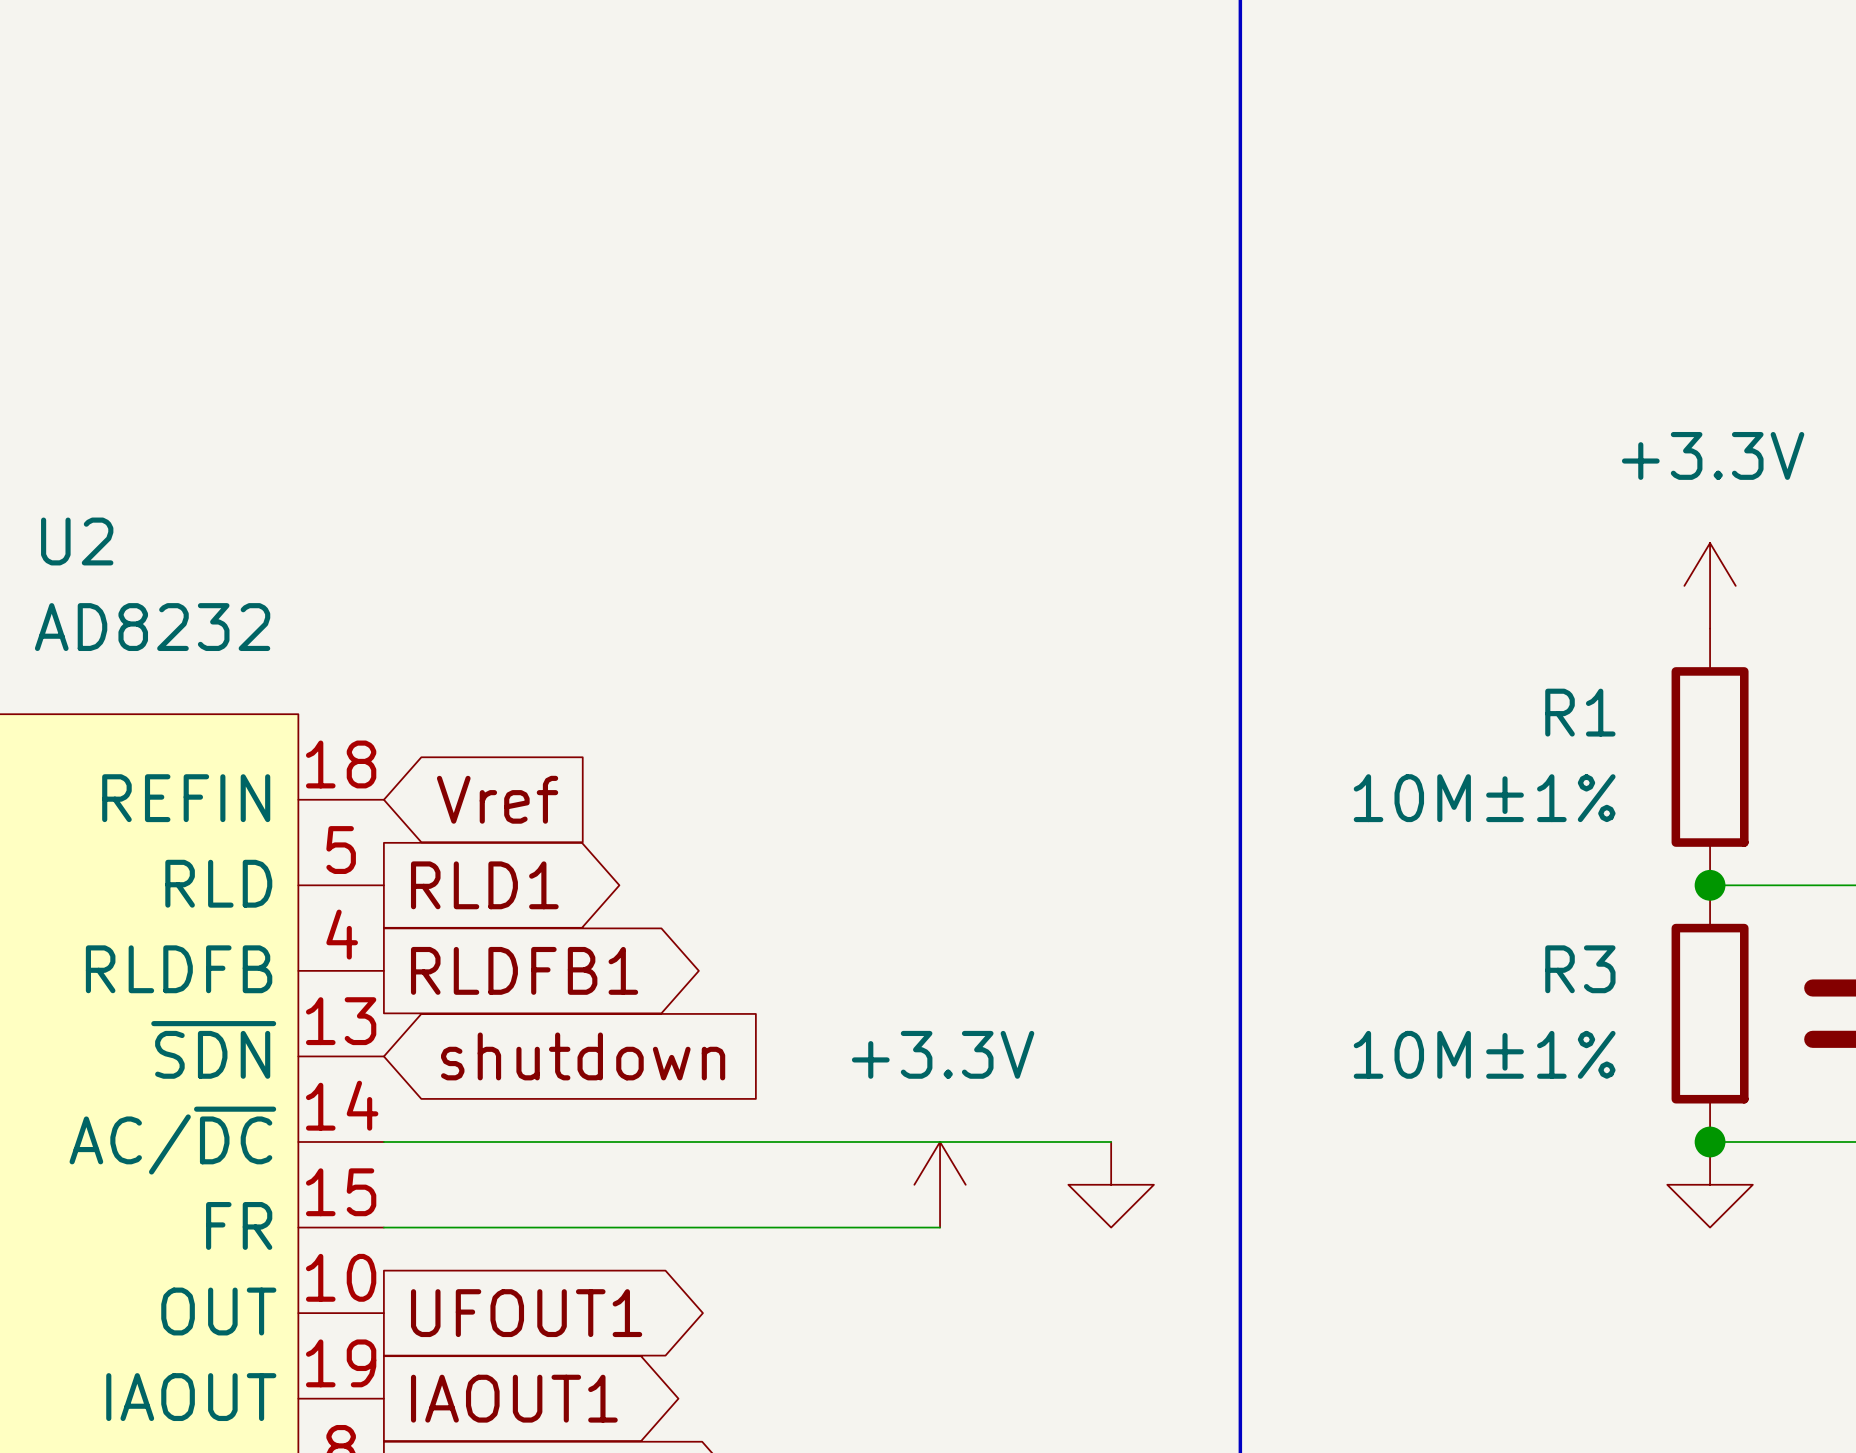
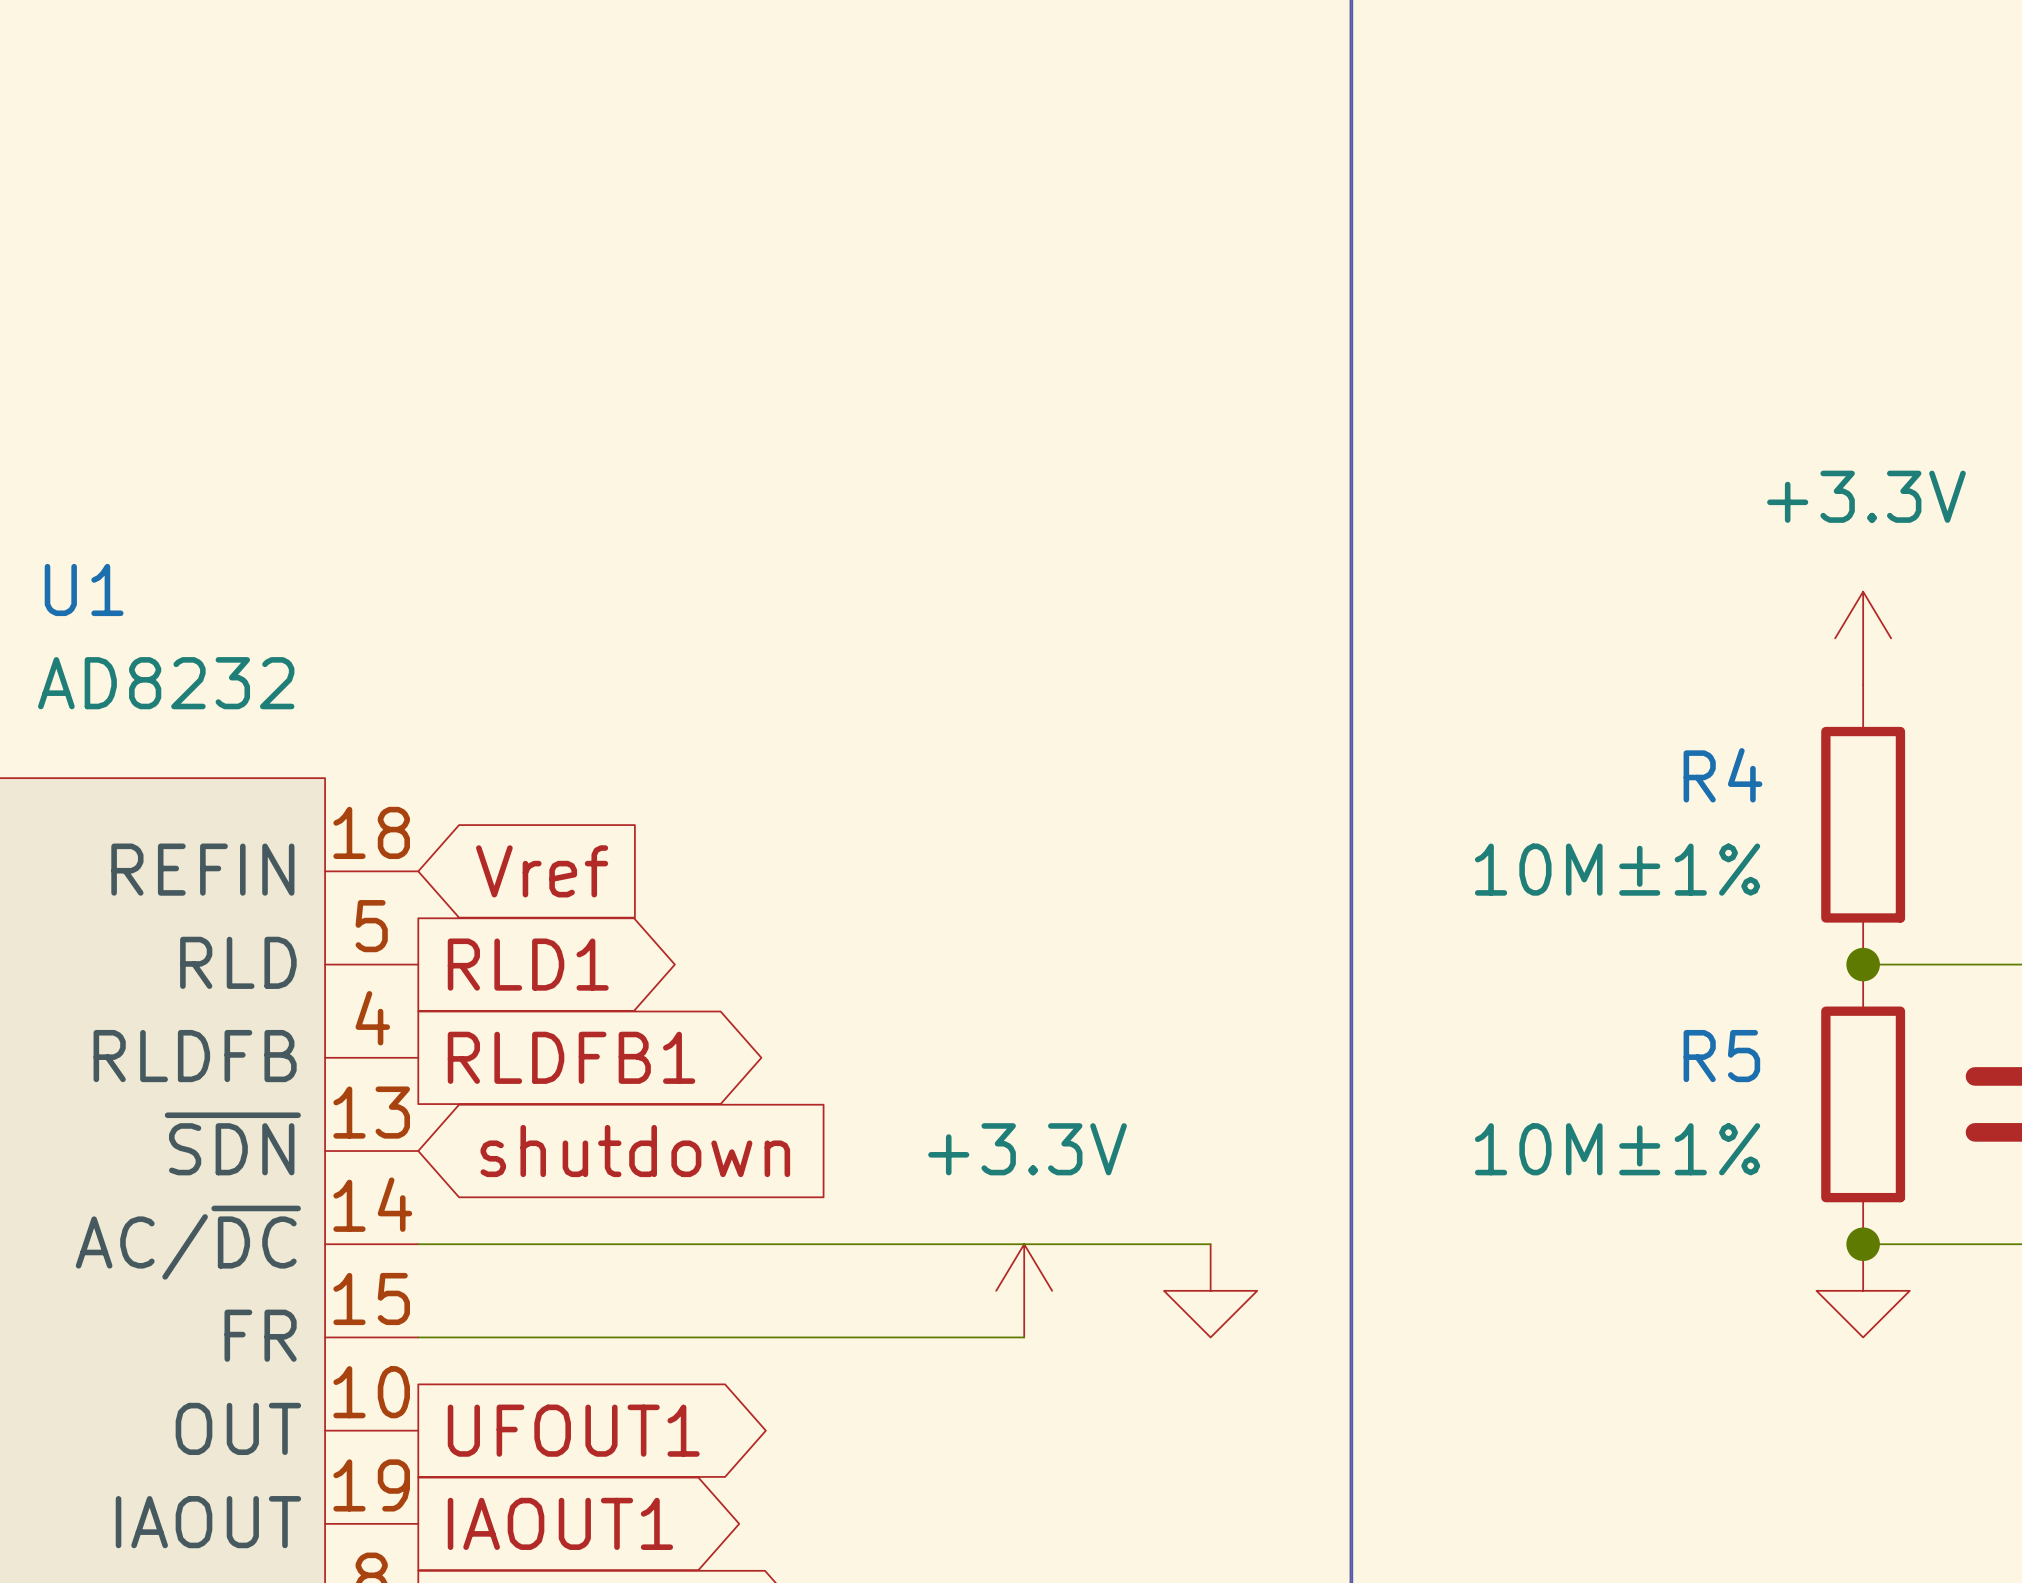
U2 name: U2 (77, 541) -> U1 (84, 589)
R1 name: R1 (1580, 712) -> R4 (1722, 775)
R3 name: R3 (1580, 969) -> R5 (1721, 1056)

